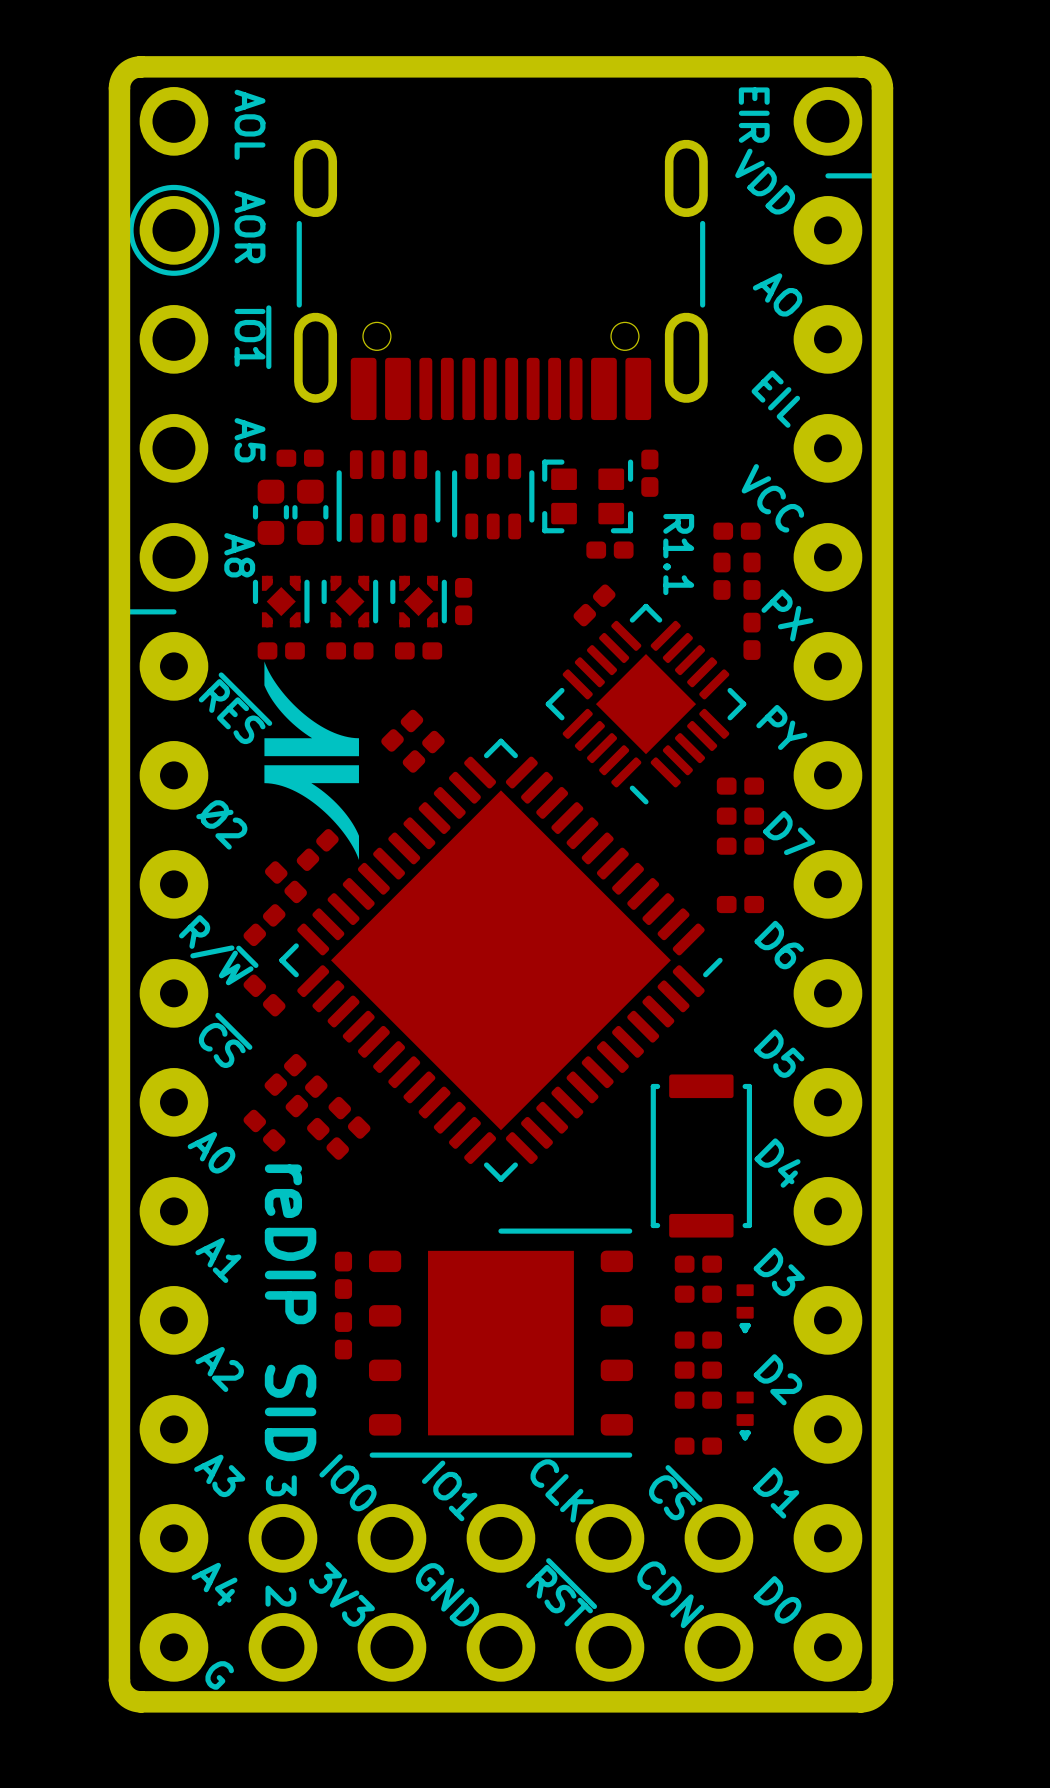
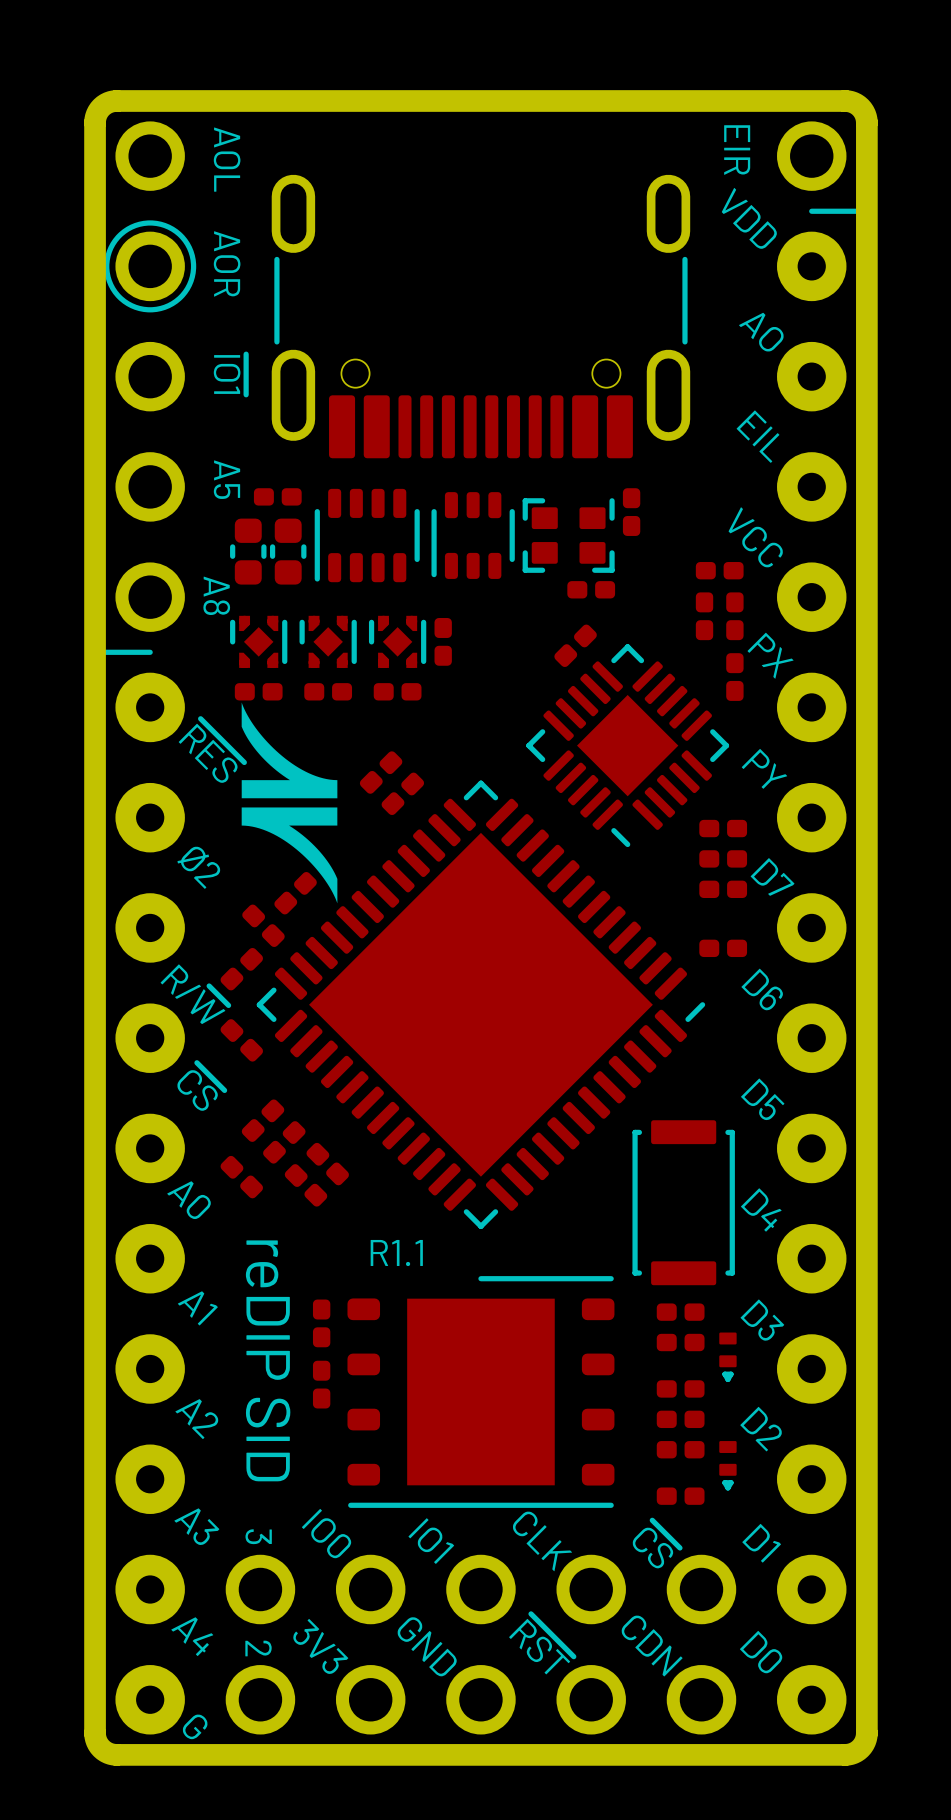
text rotation: 0° (678, 554) -> 90° counterclockwise (396, 1253)
text position: R1.1 (678, 554) -> R1.1 (396, 1253)

